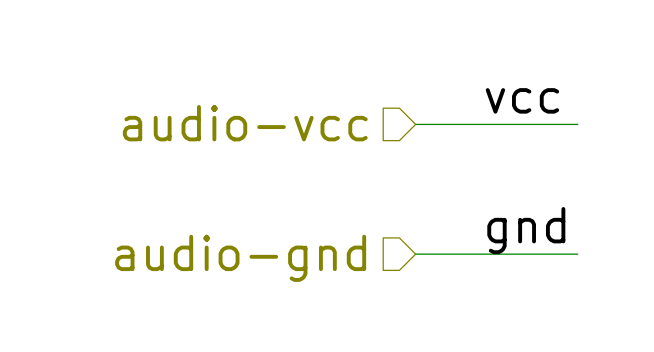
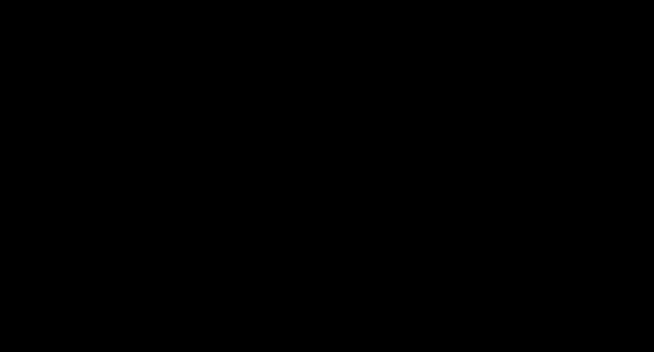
label: vcc (522, 100) -> none
hierarchical label: audio-vcc (245, 123) -> none
wire: (415, 124) (577, 124) -> none
label: gnd (526, 230) -> none
wire: (415, 254) (577, 254) -> none
hierarchical label: audio-gnd (240, 258) -> none

